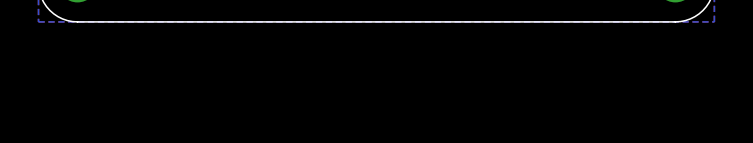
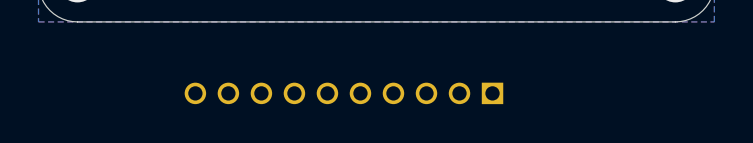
part: none -> (343, 93)

